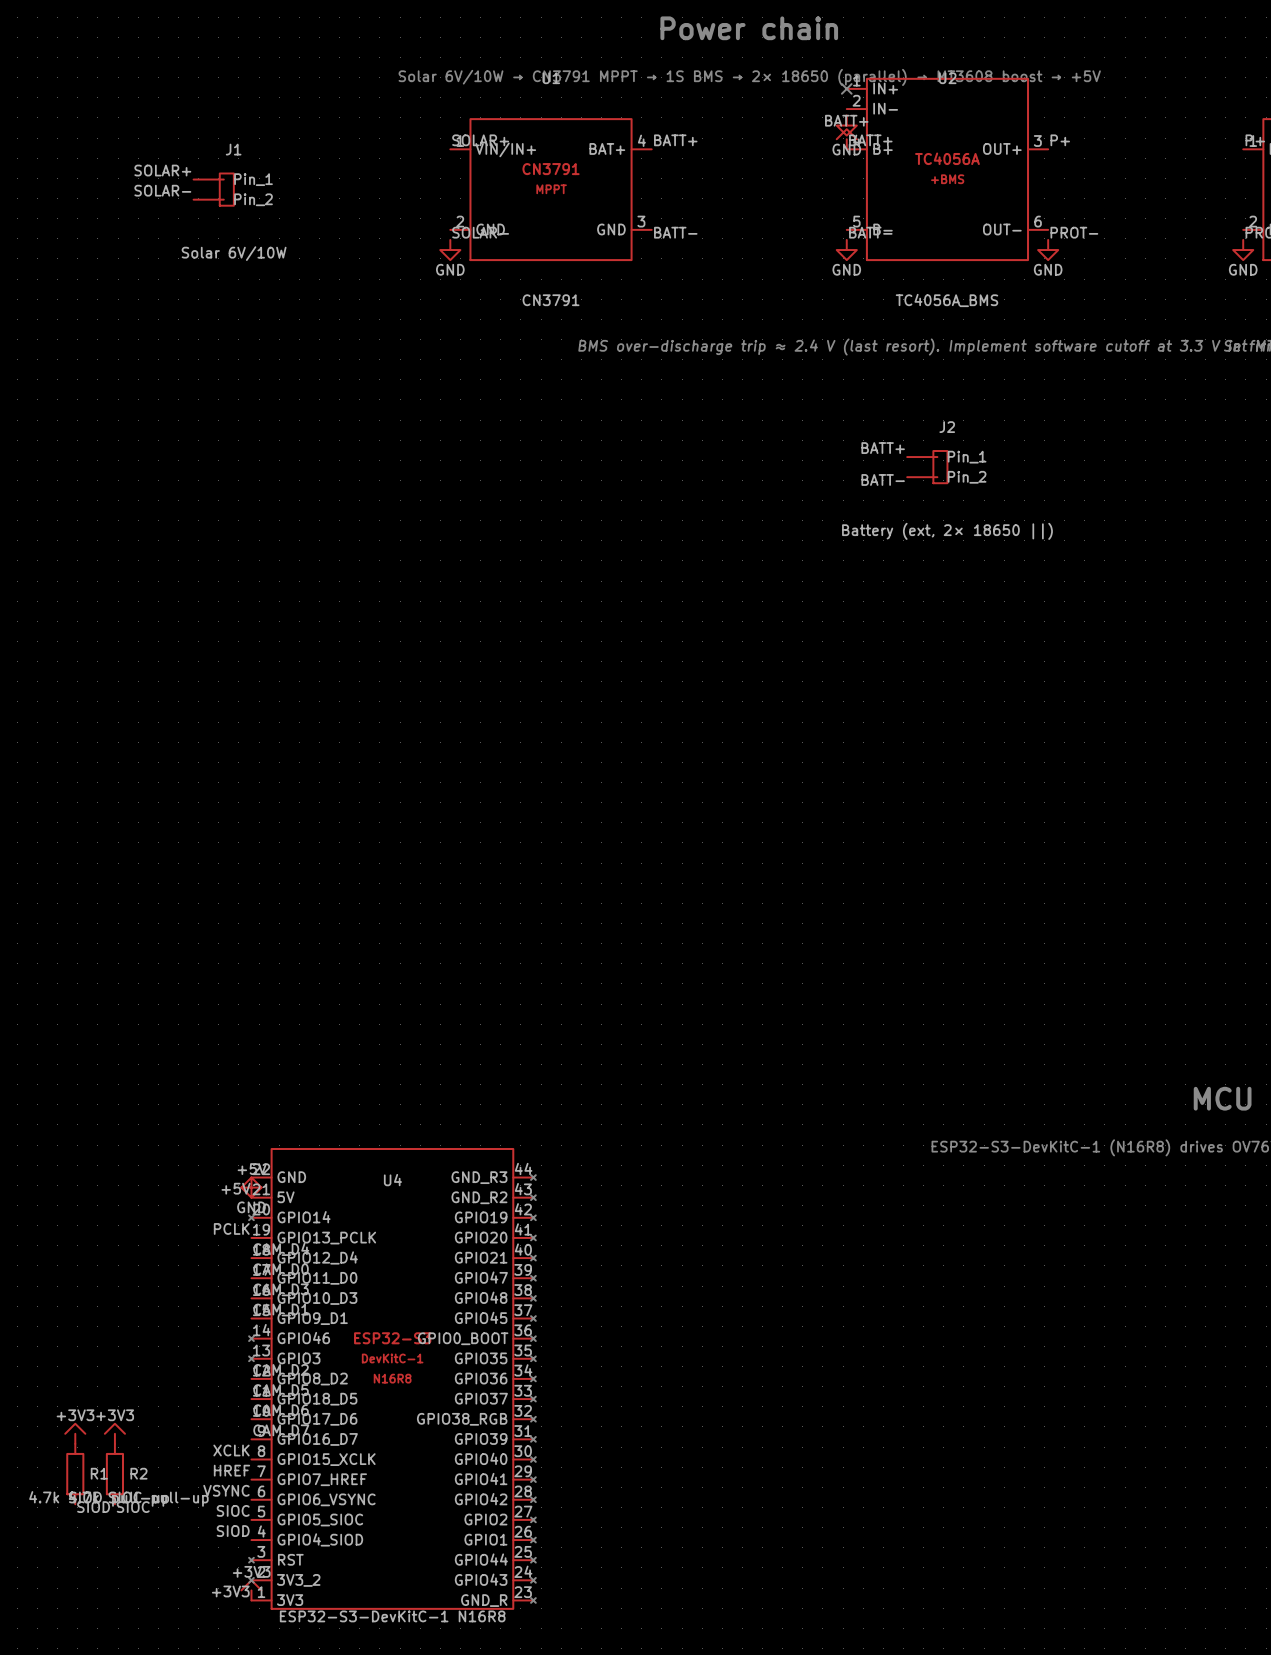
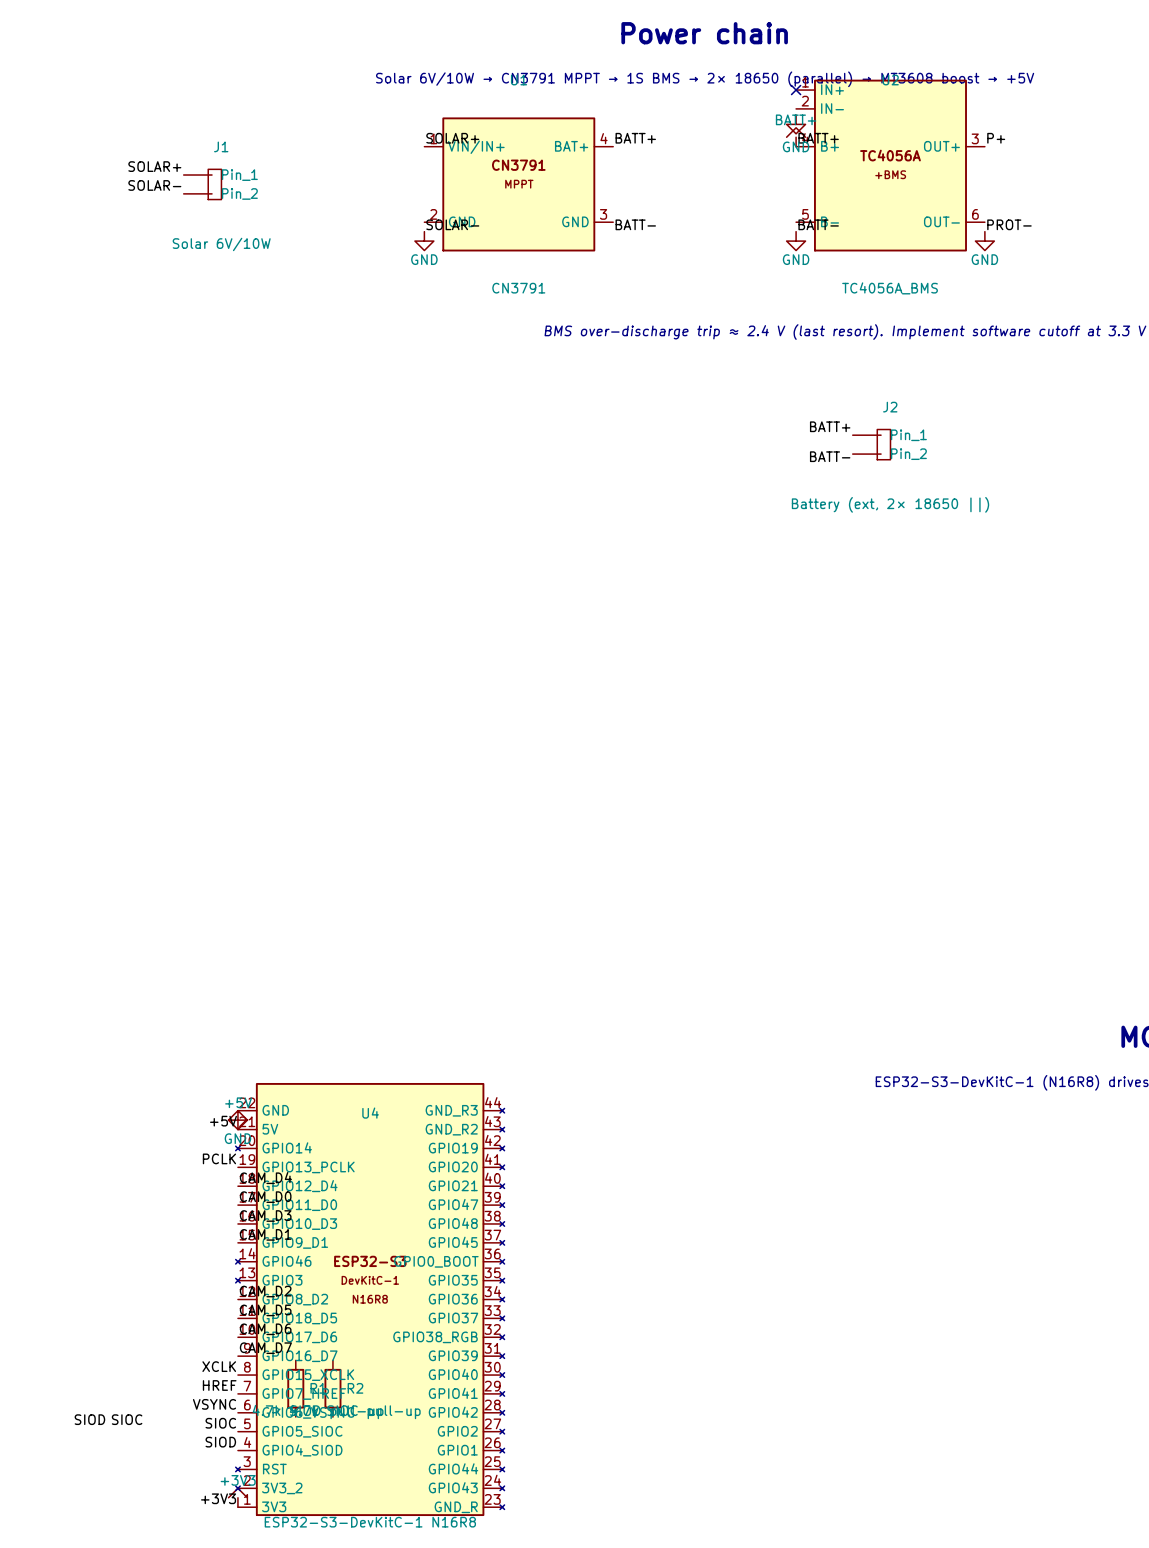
power symbol: +3V3 (75, 1433) -> none
power symbol: +3V3 (114, 1433) -> none
R1 position: (75, 1474) -> (295, 1388)
R2 position: (114, 1474) -> (332, 1388)

